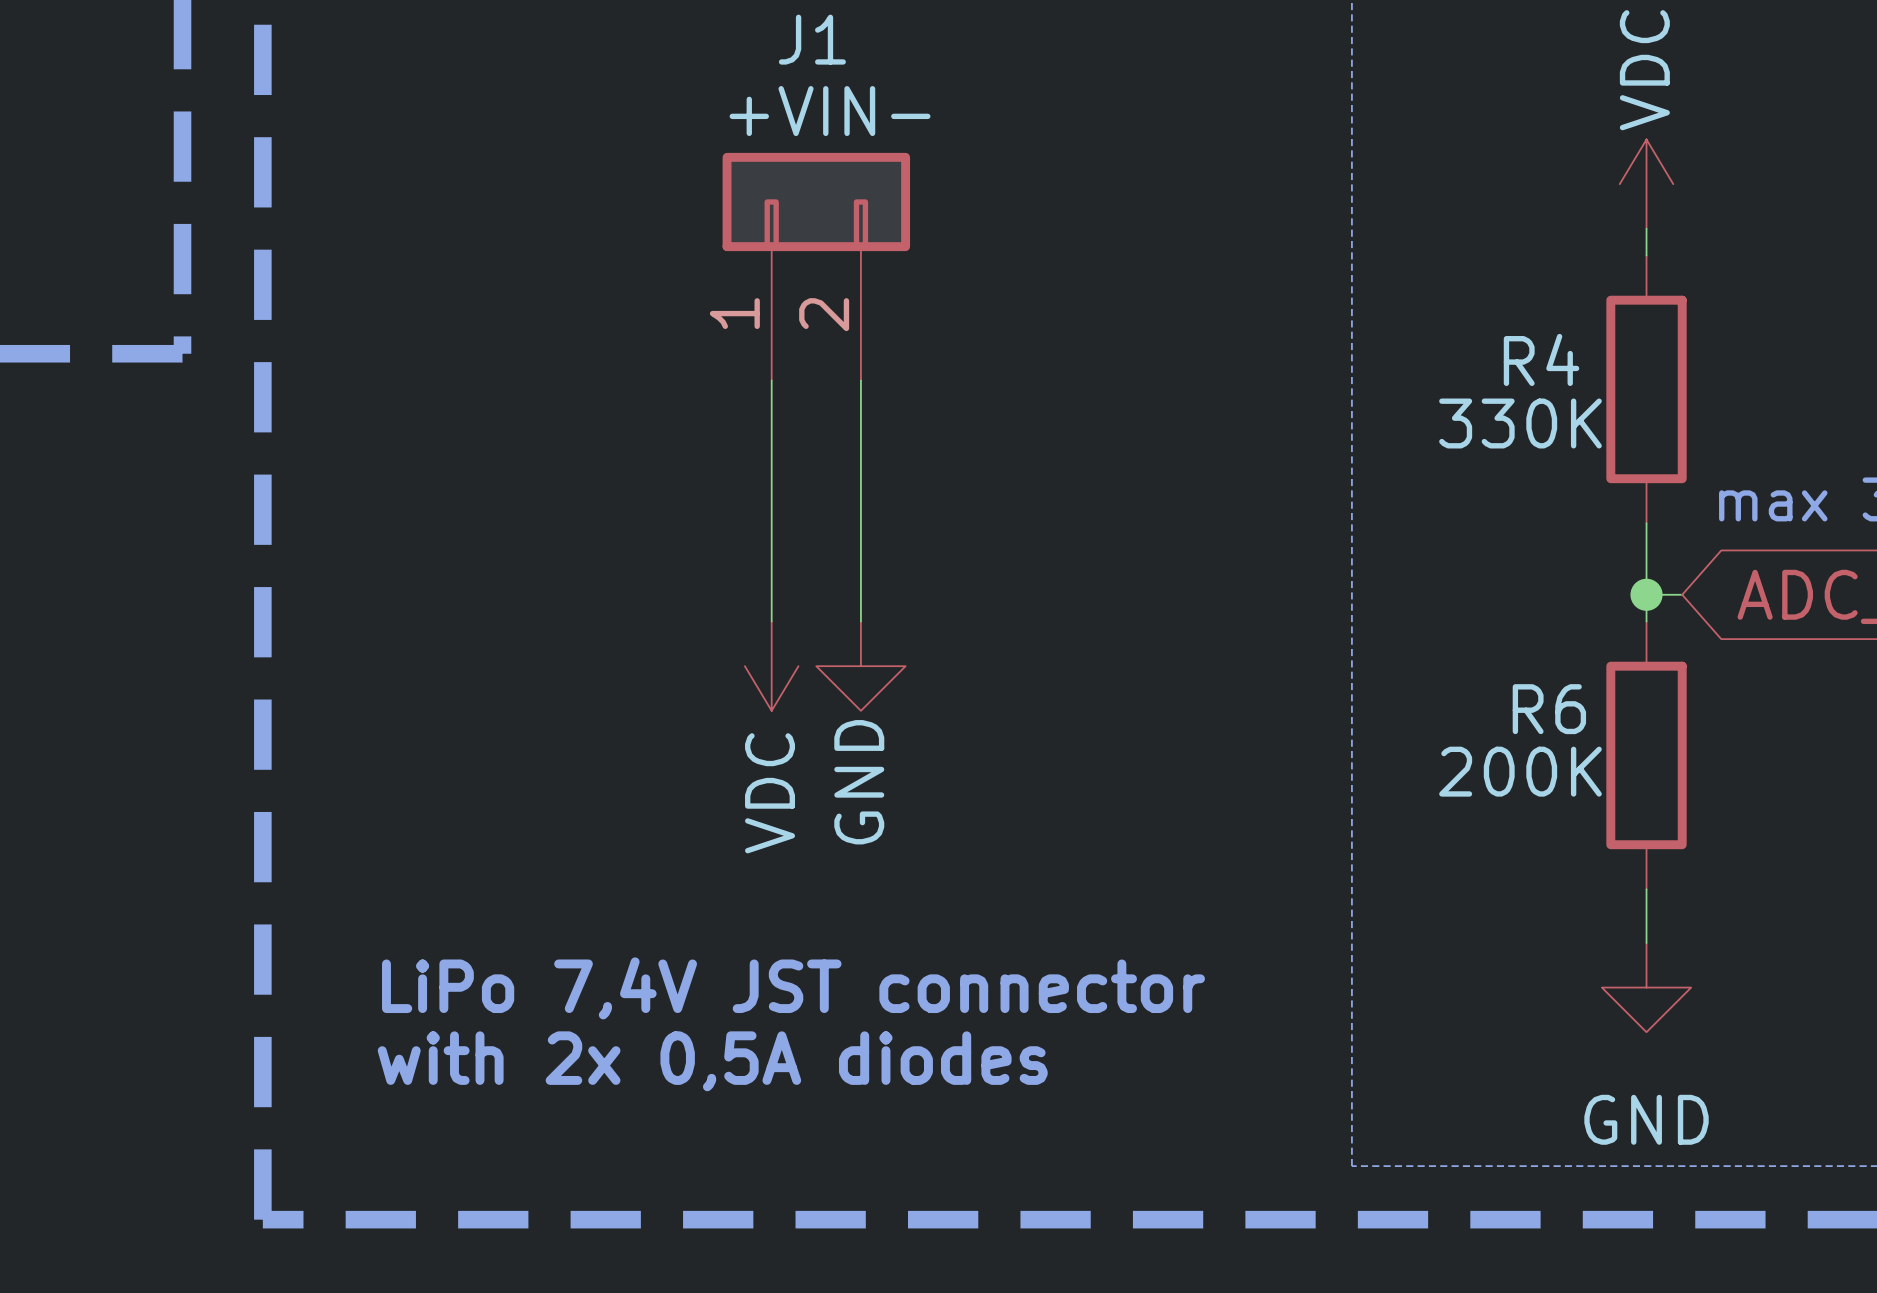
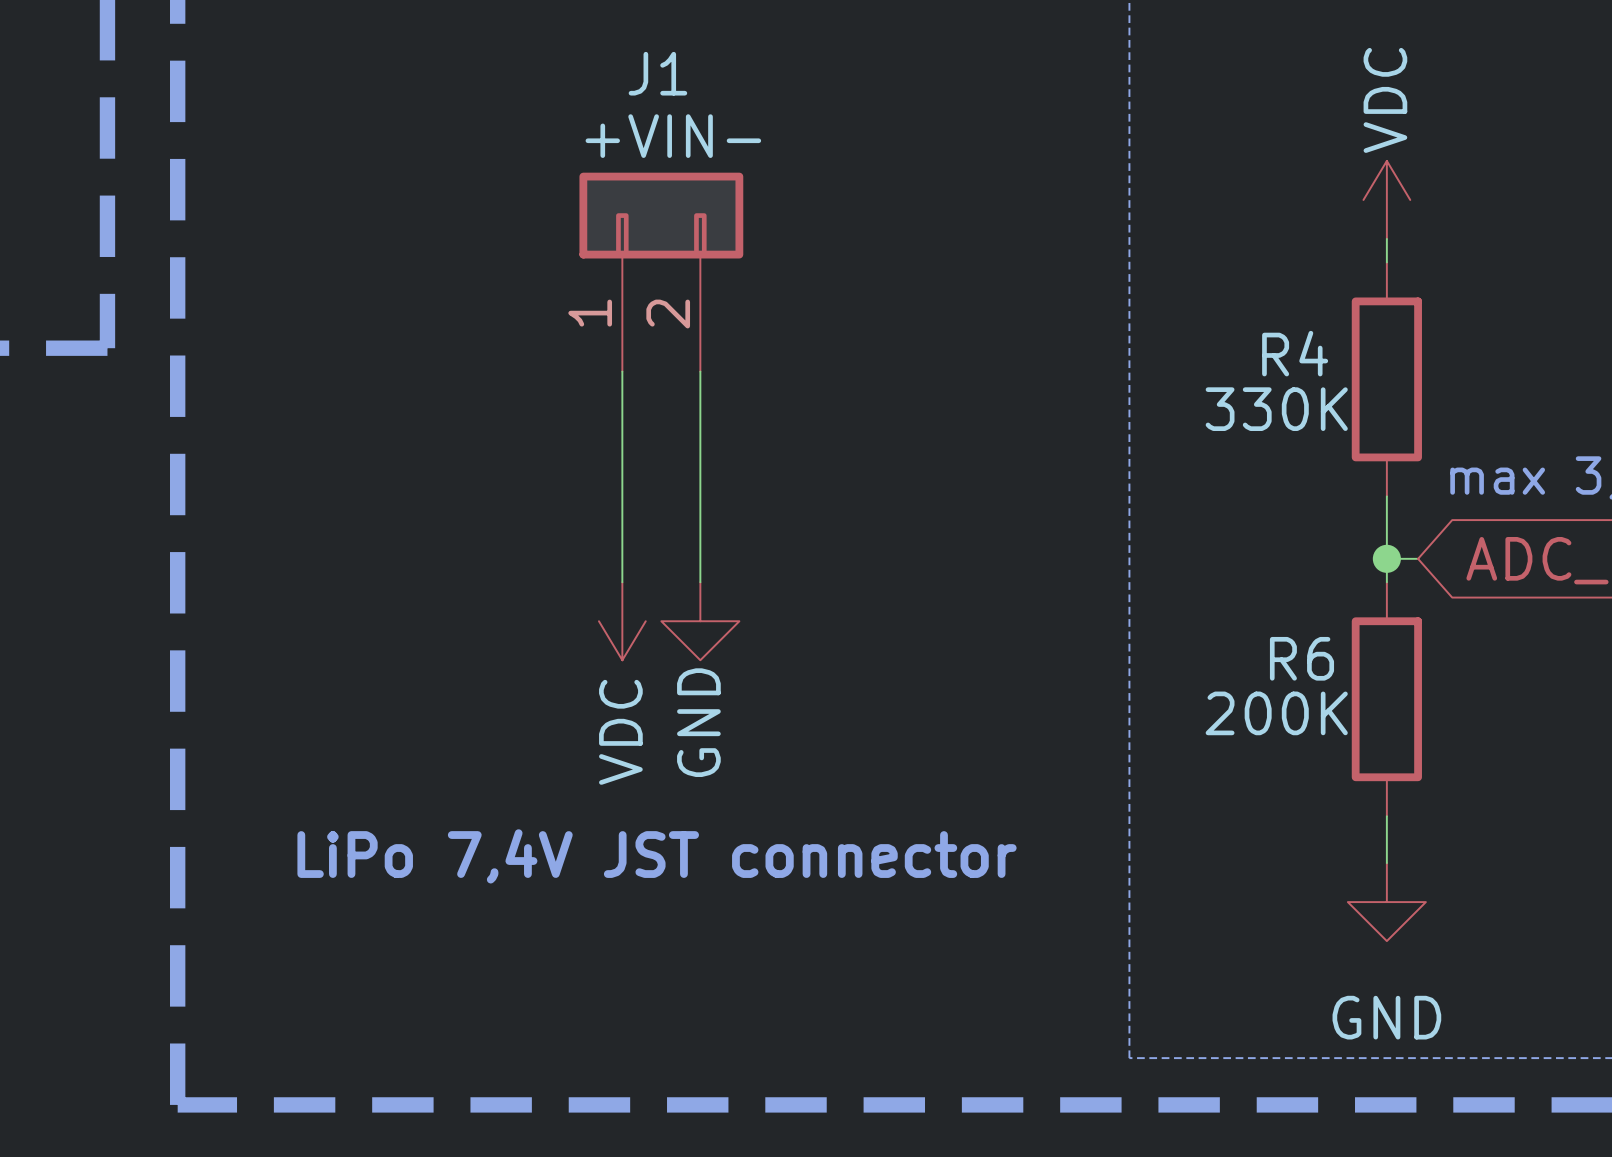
text position: LiPo 7,4V JST connector (793, 988) -> LiPo 7,4V JST connector (657, 856)
text: with 2x 0,5A diodes (712, 1061) -> none

